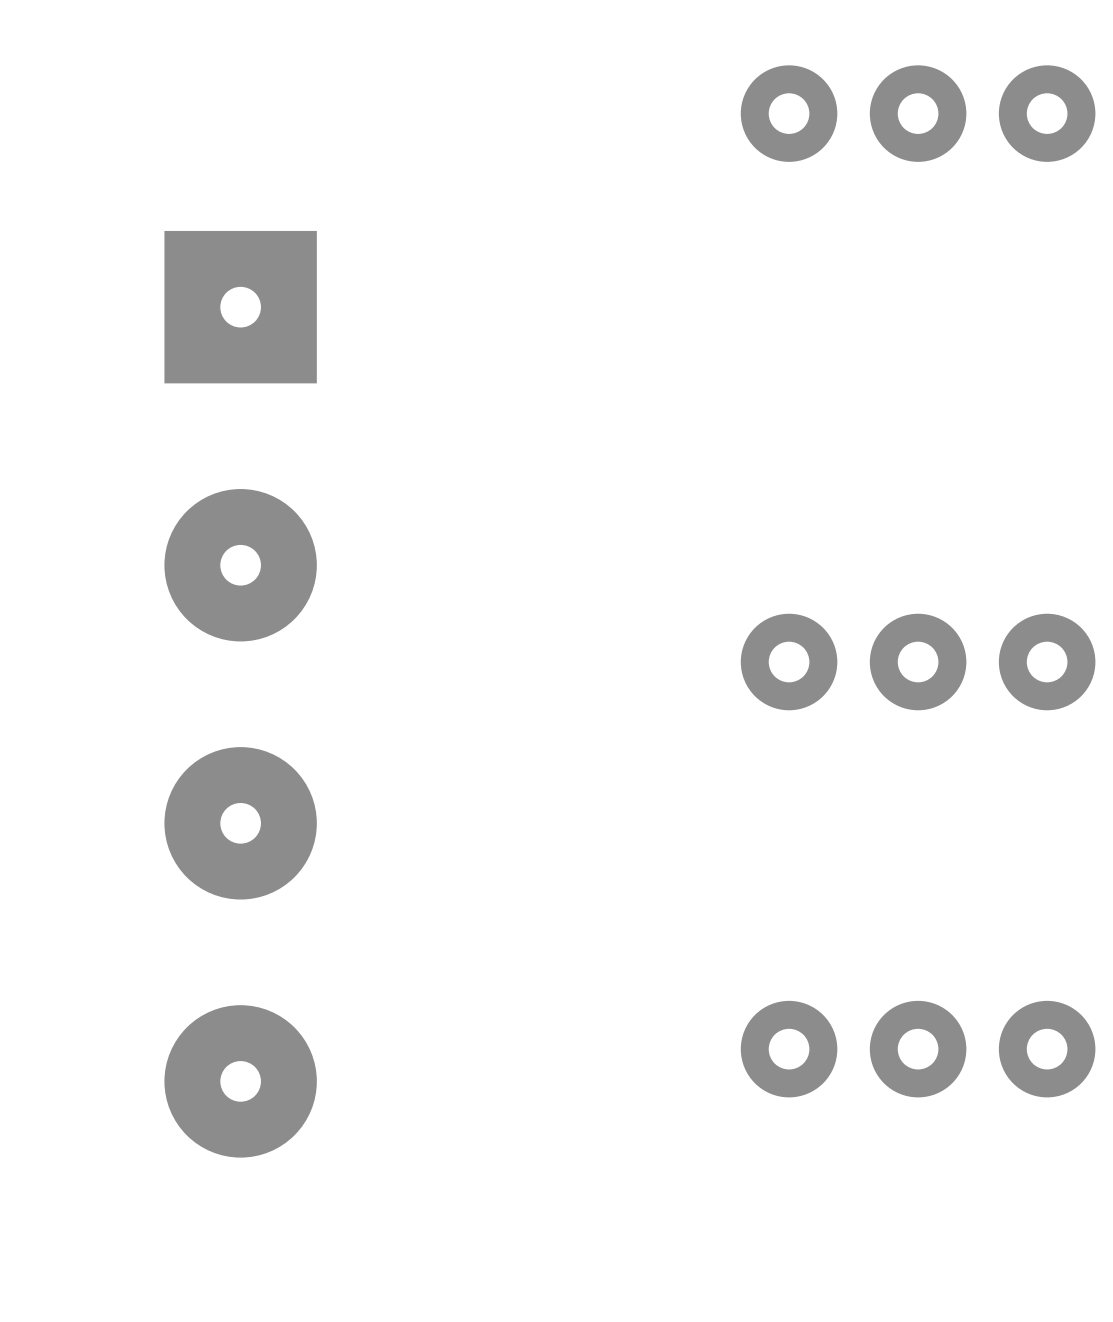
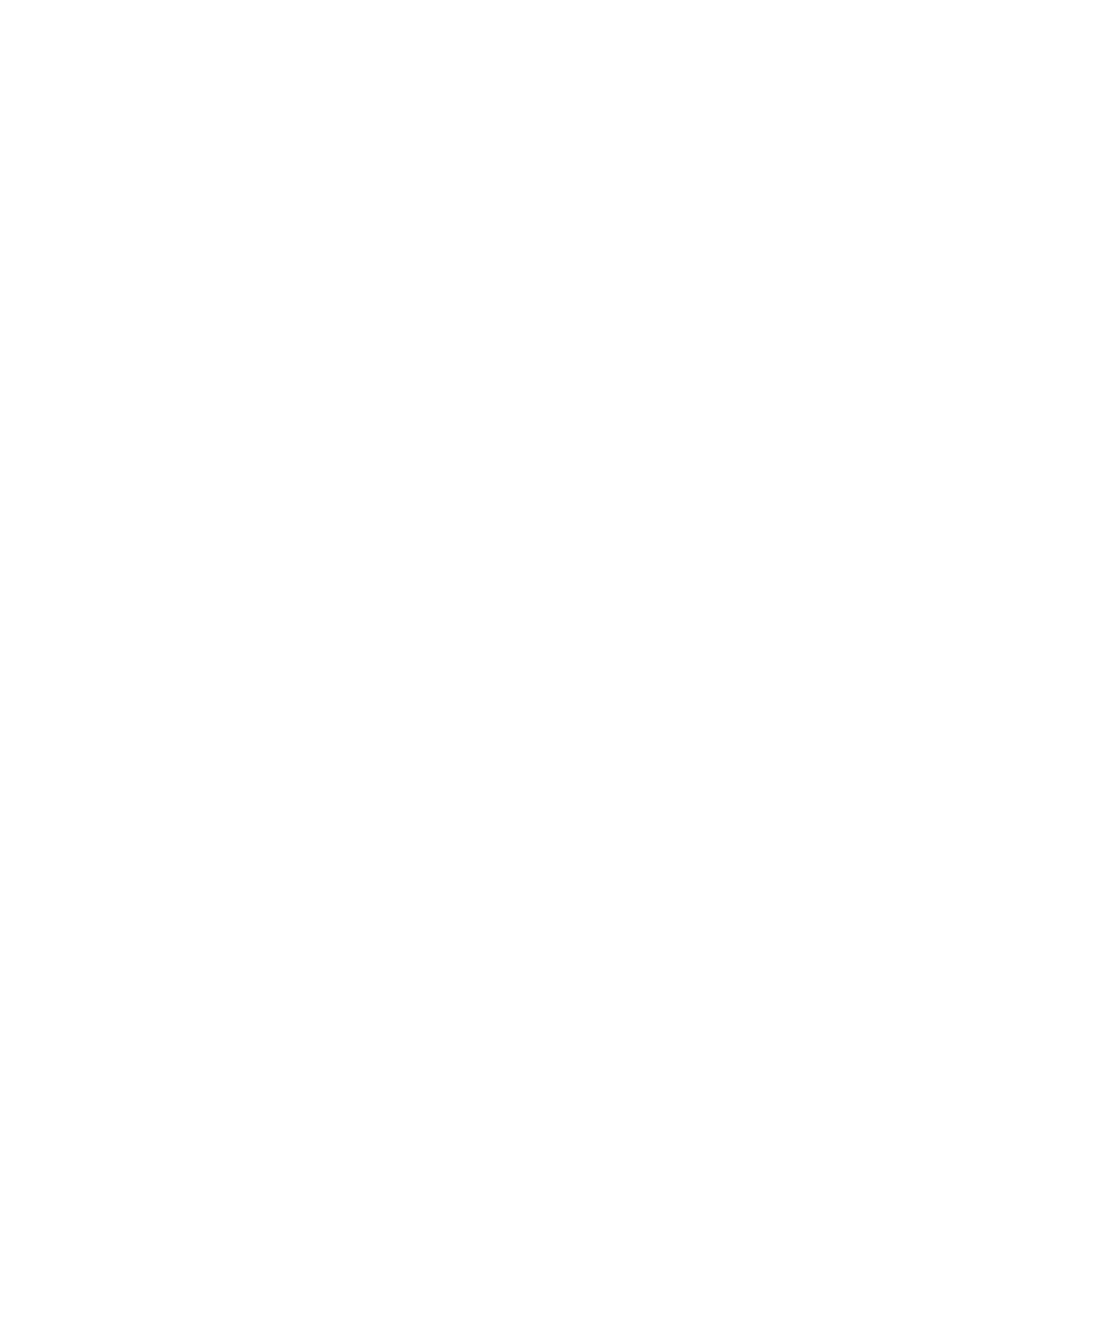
part: (918, 113) -> none
part: (918, 662) -> none
part: (240, 694) -> none
part: (918, 1049) -> none

